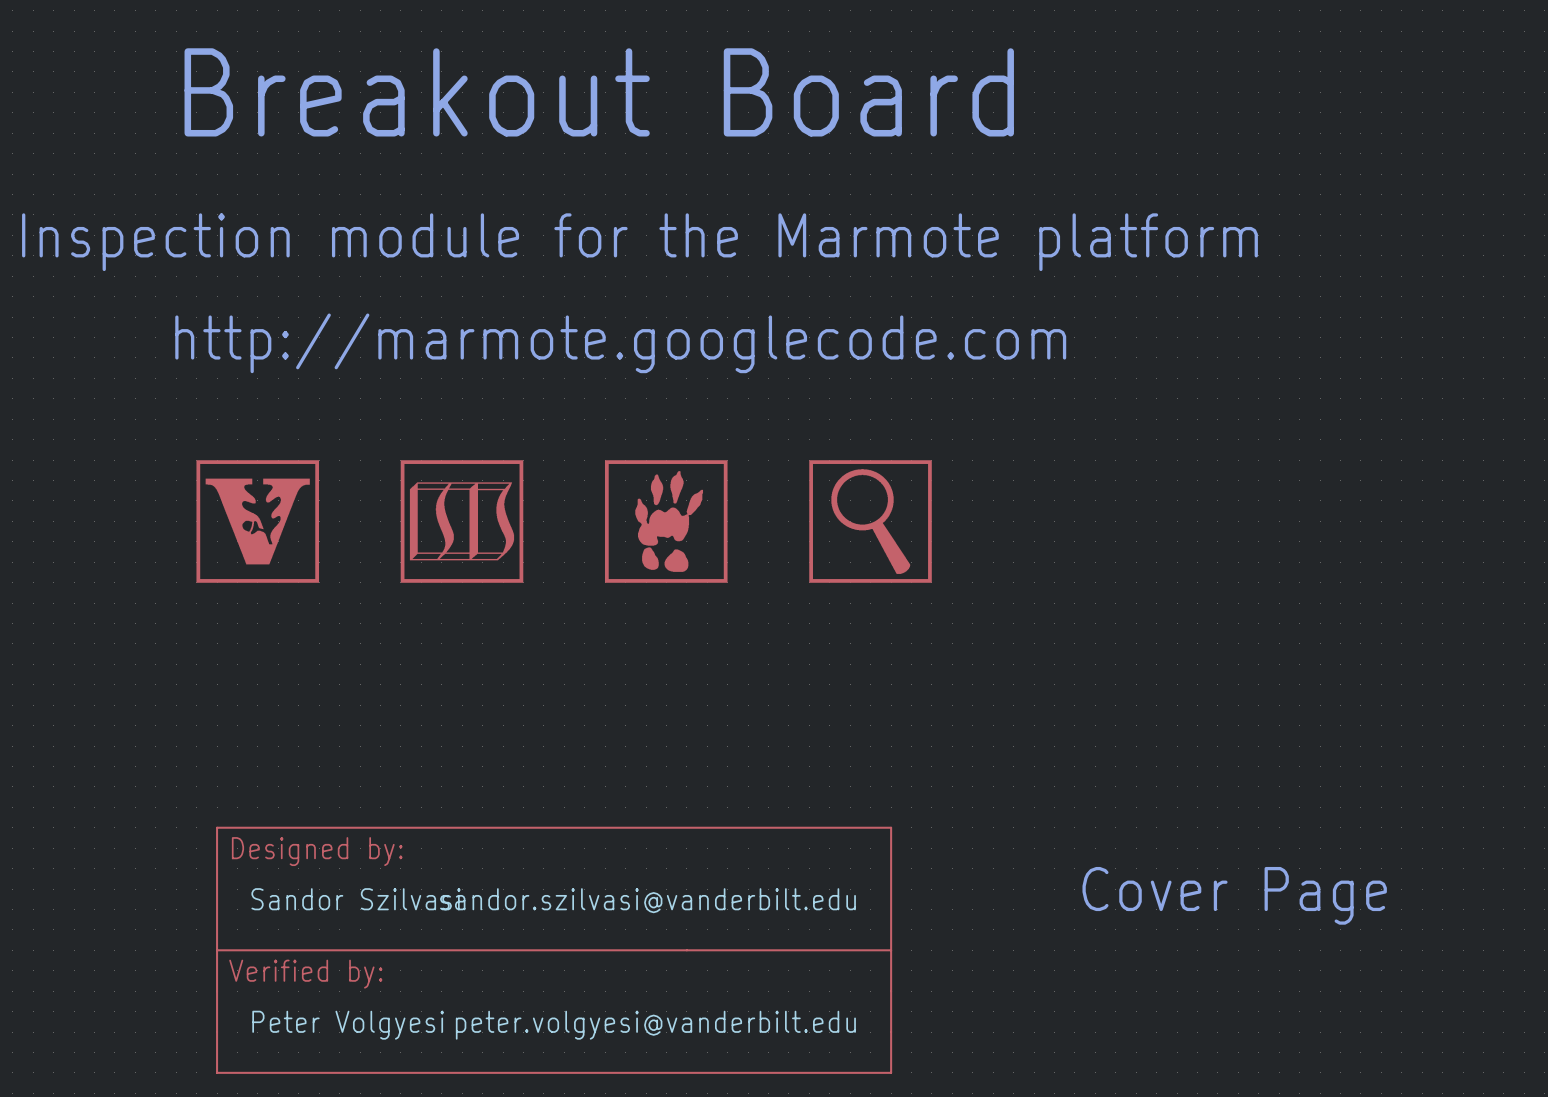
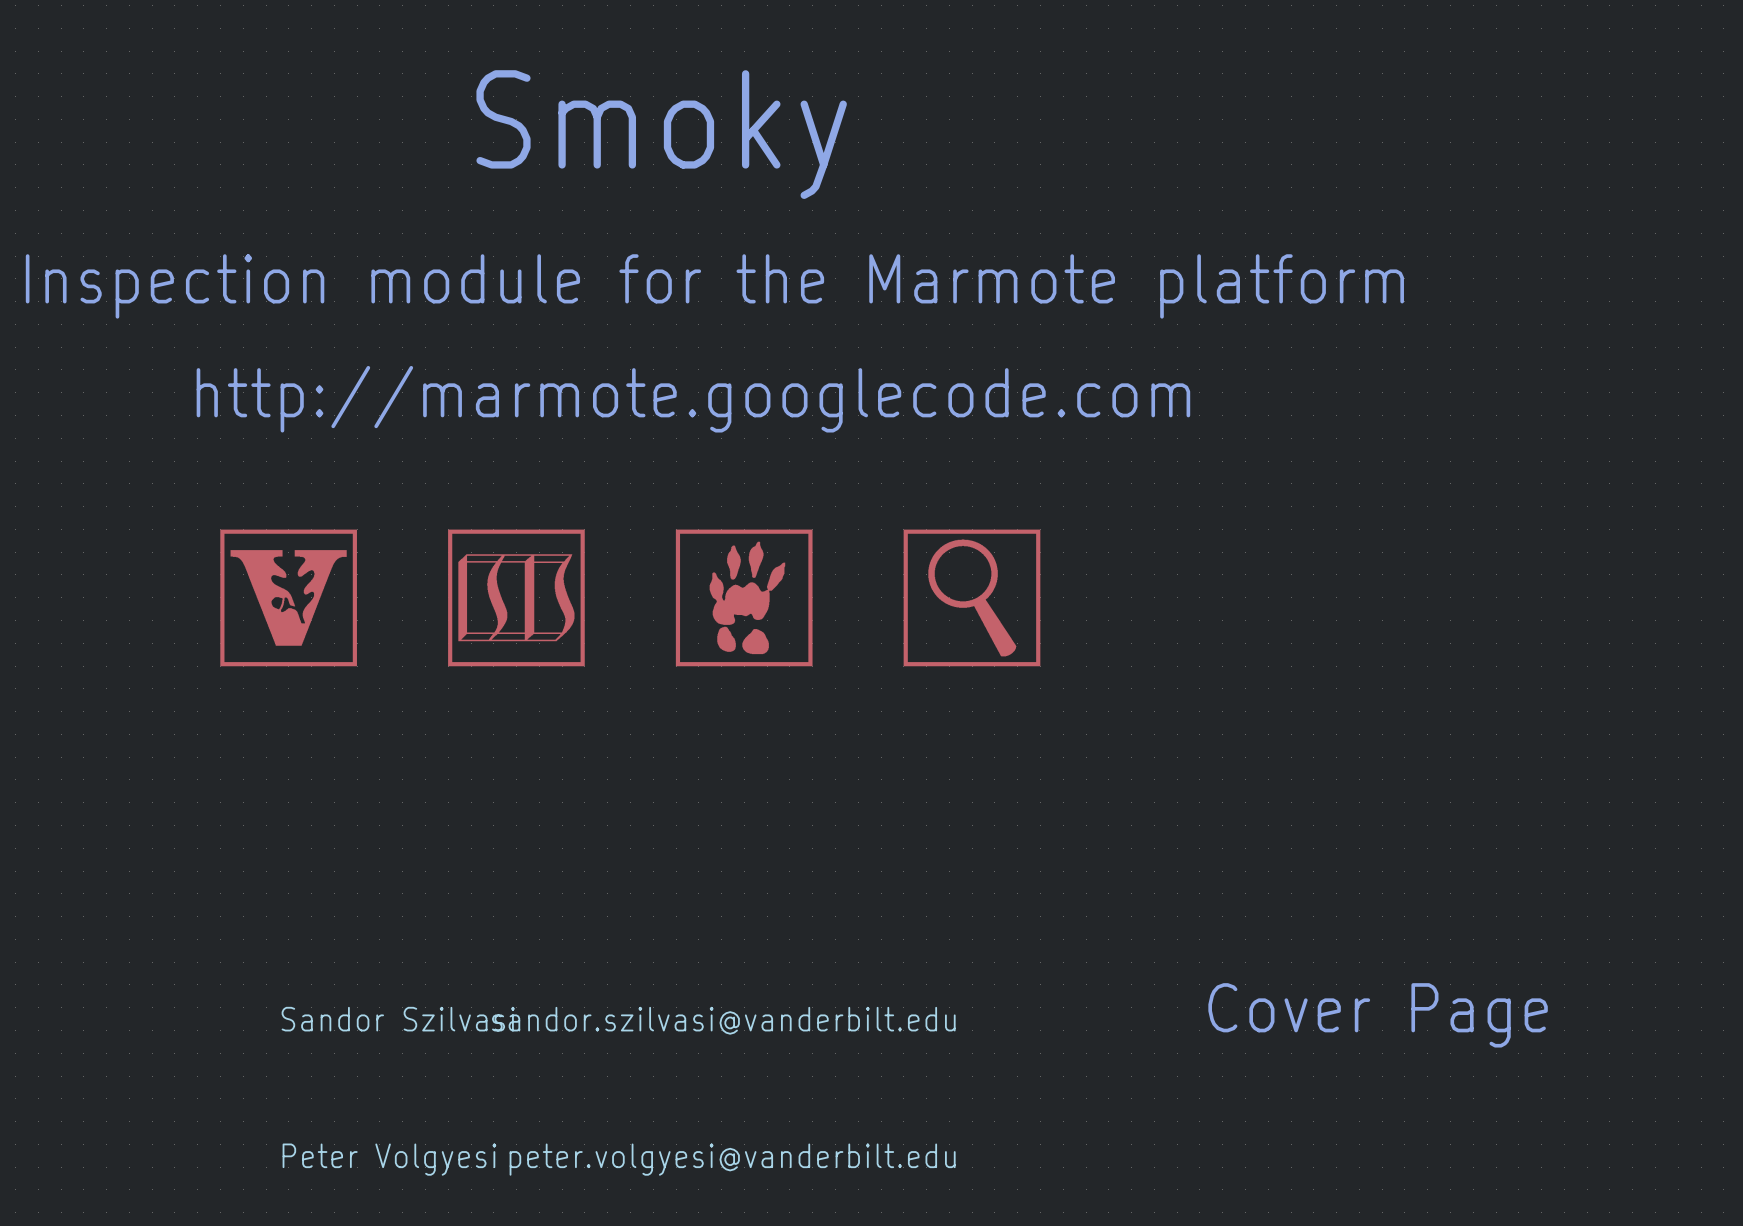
text: Breakout Board (599, 92) -> none
text: none -> Smoky (661, 134)
part: (554, 950) -> none

